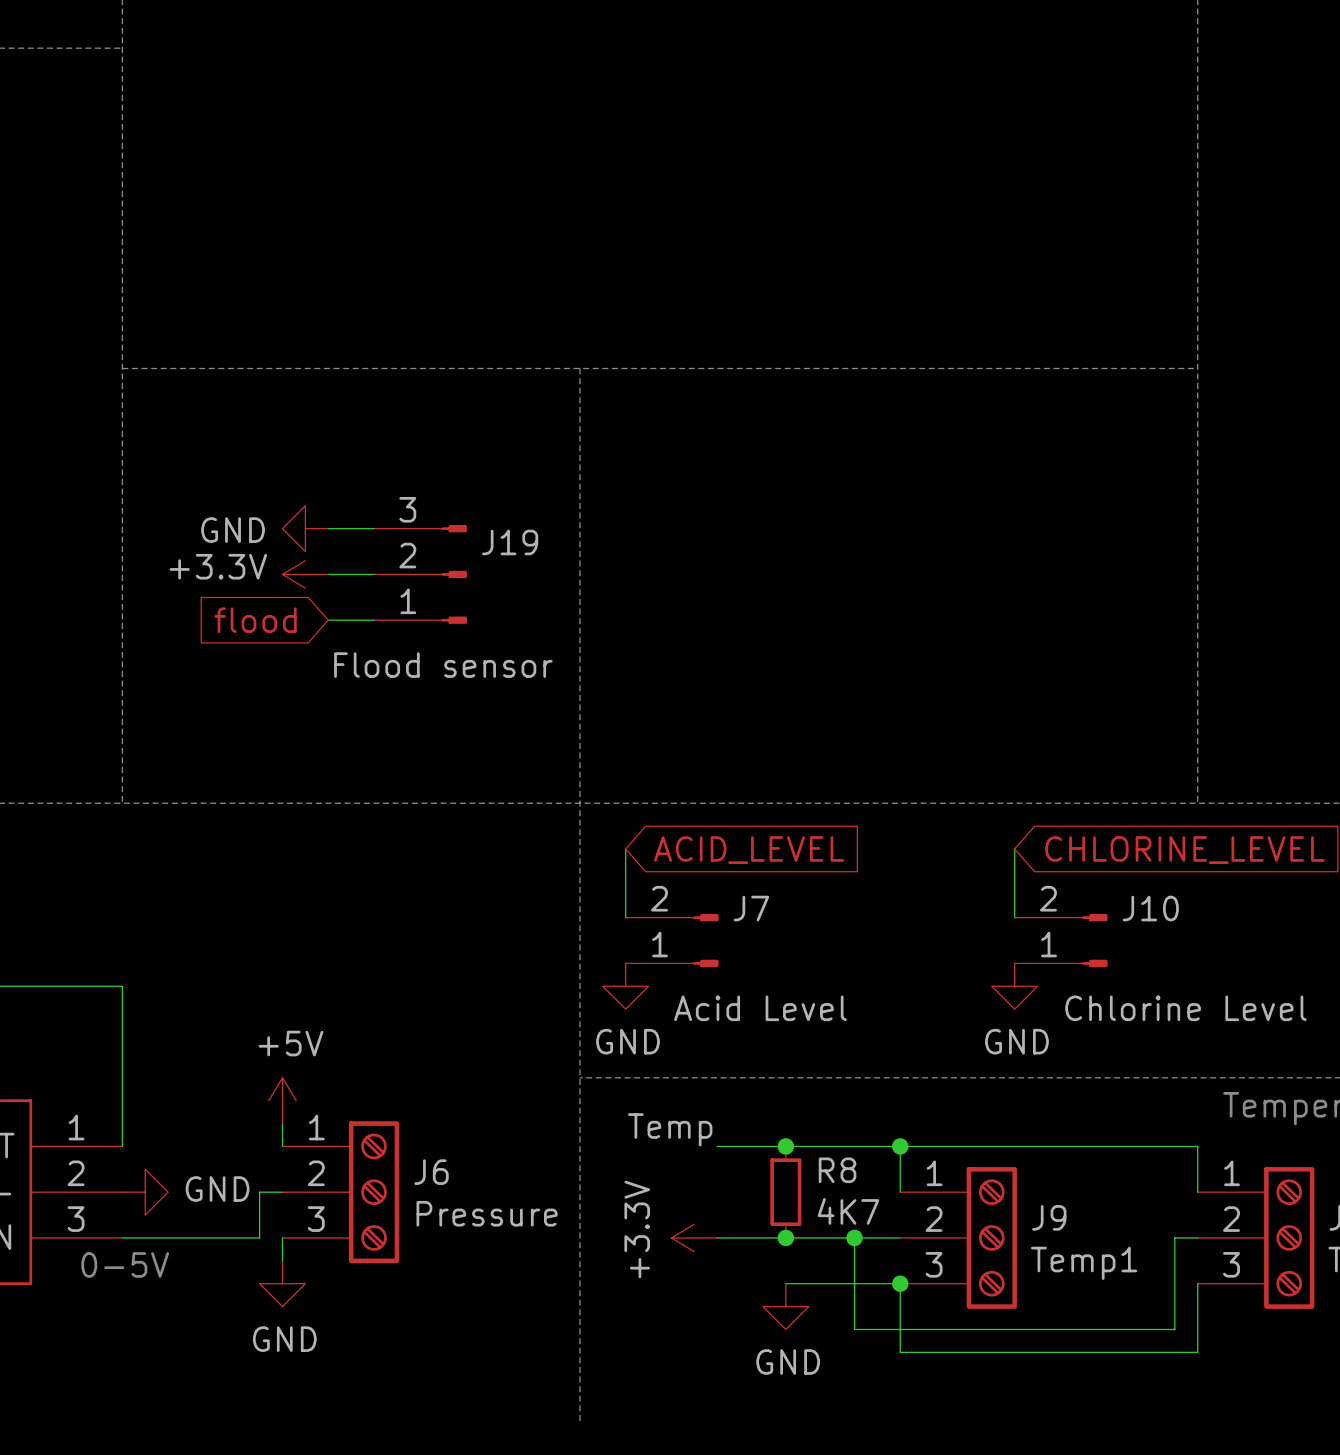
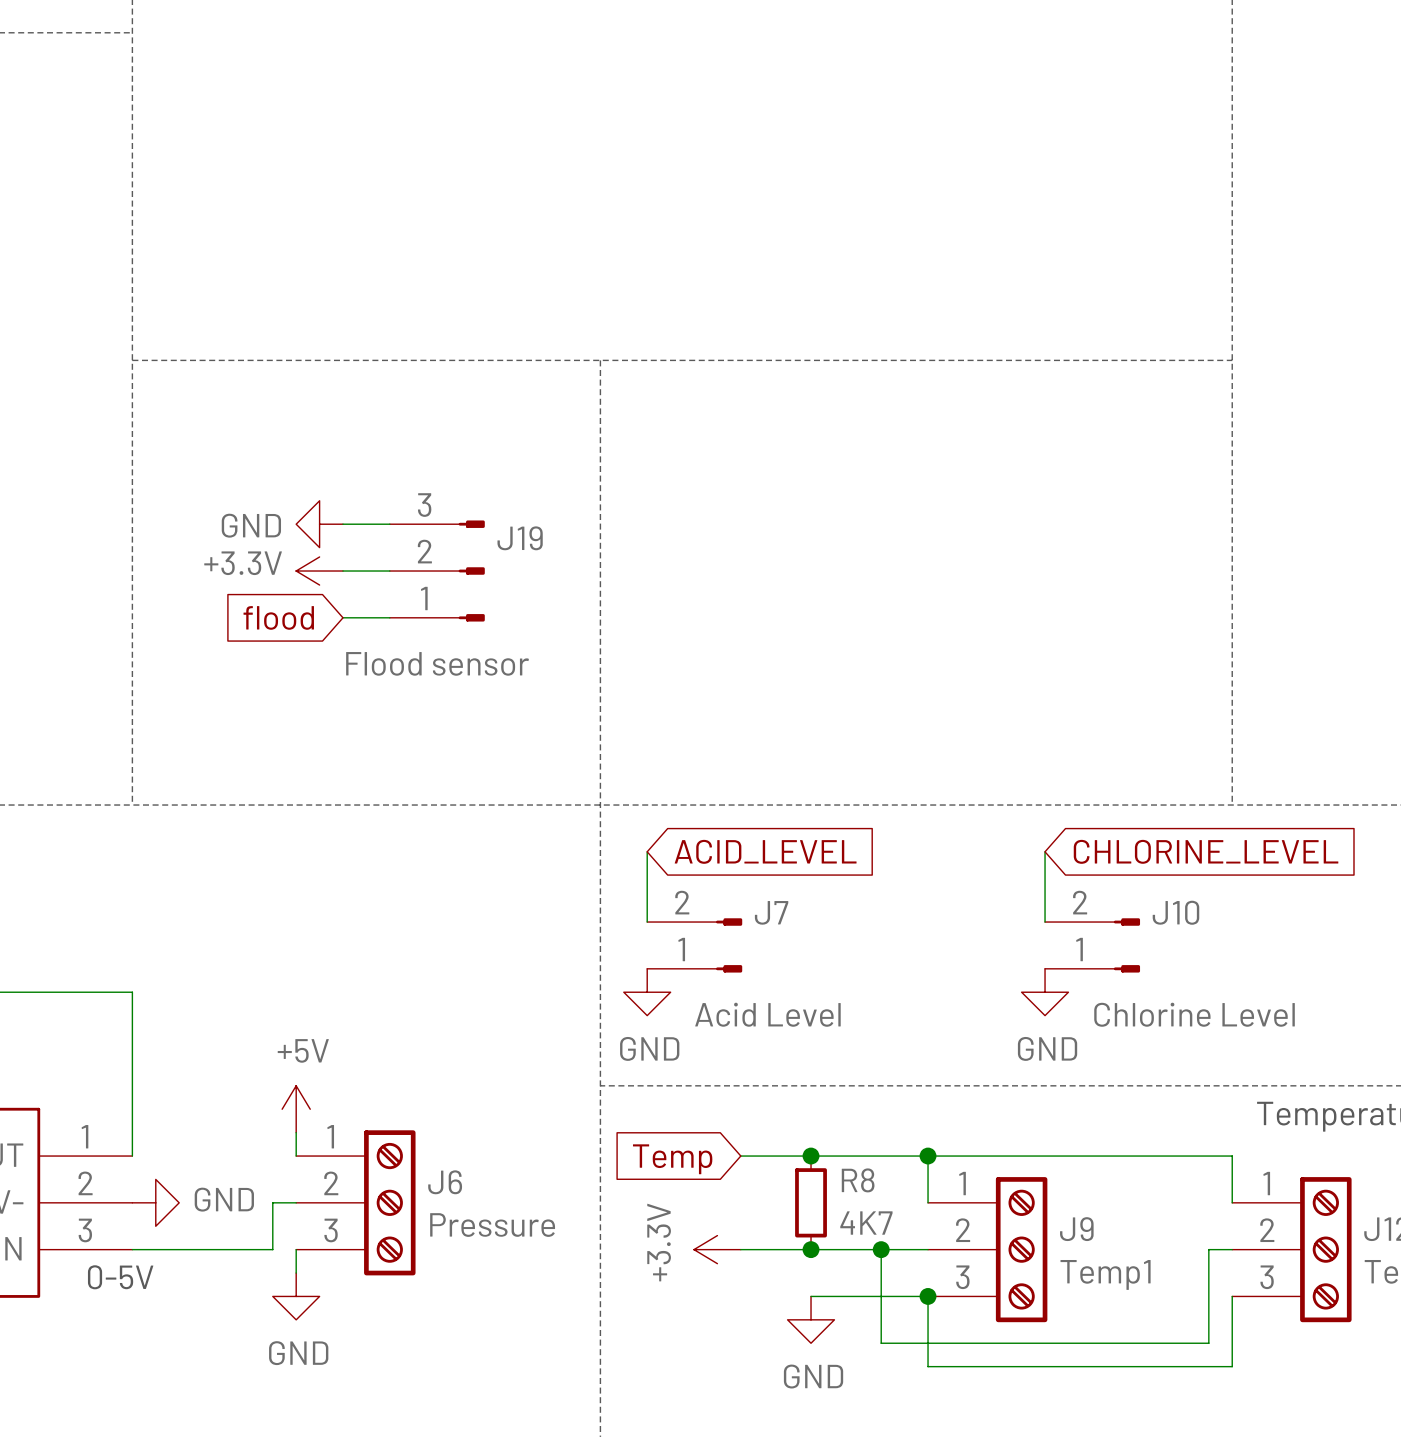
label: Temp (670, 1129) -> none
global label: none -> Temp (672, 1159)

